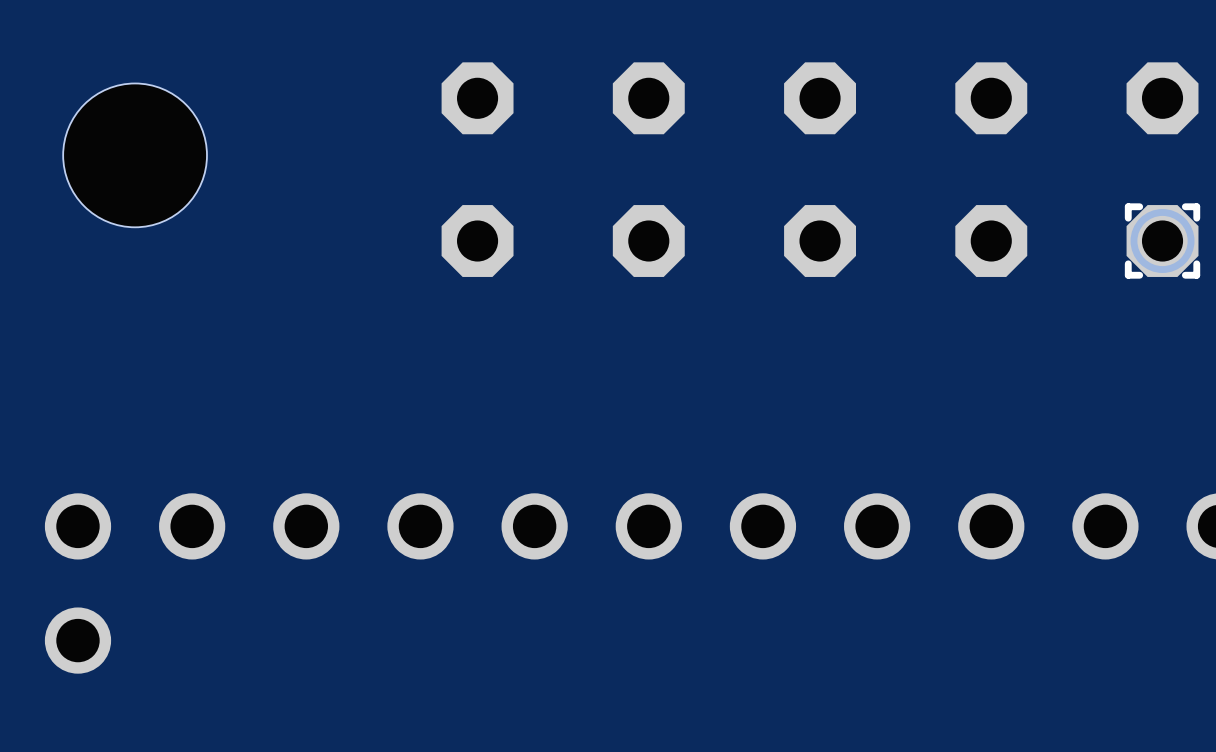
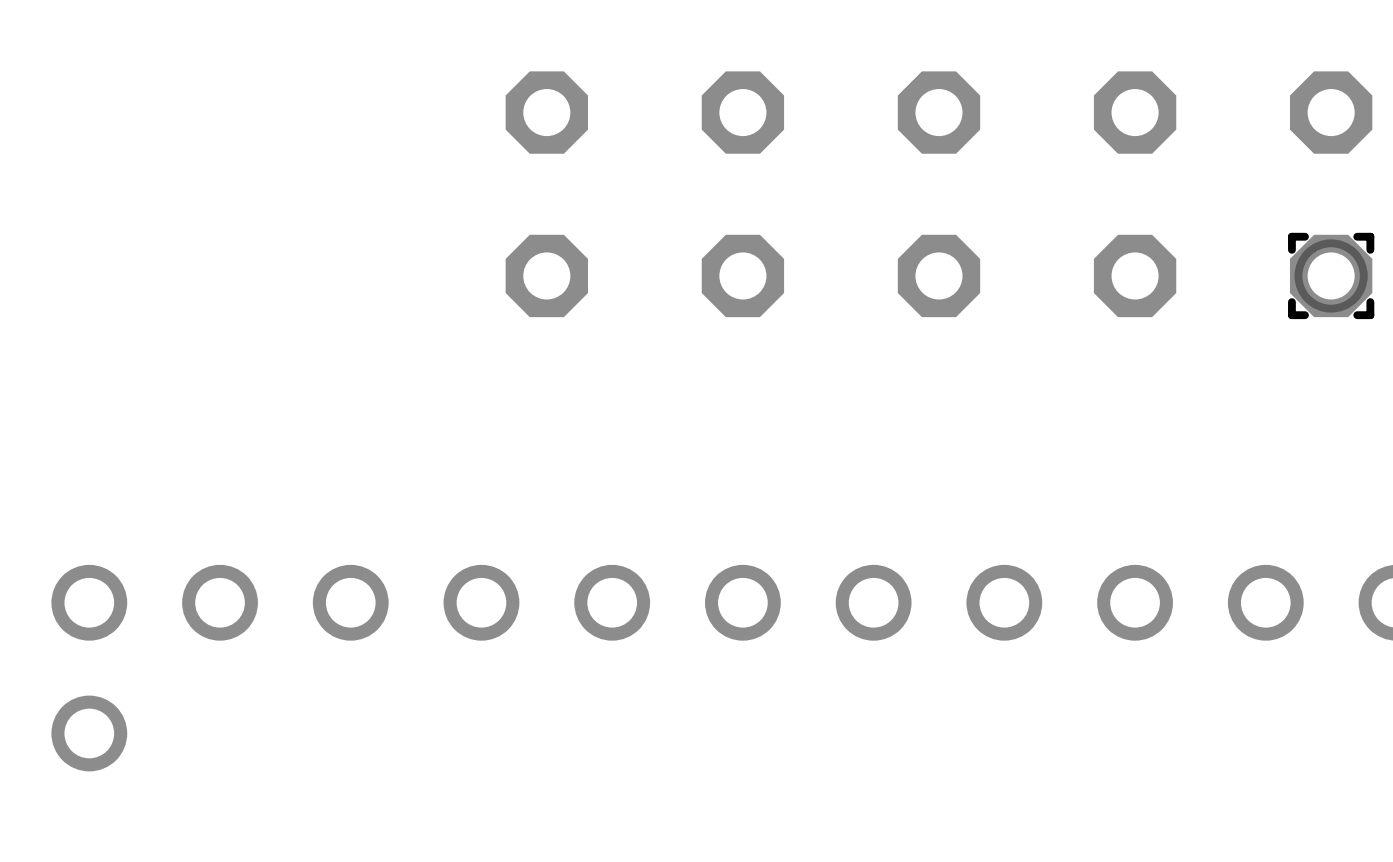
hole: (135, 155) -> none

